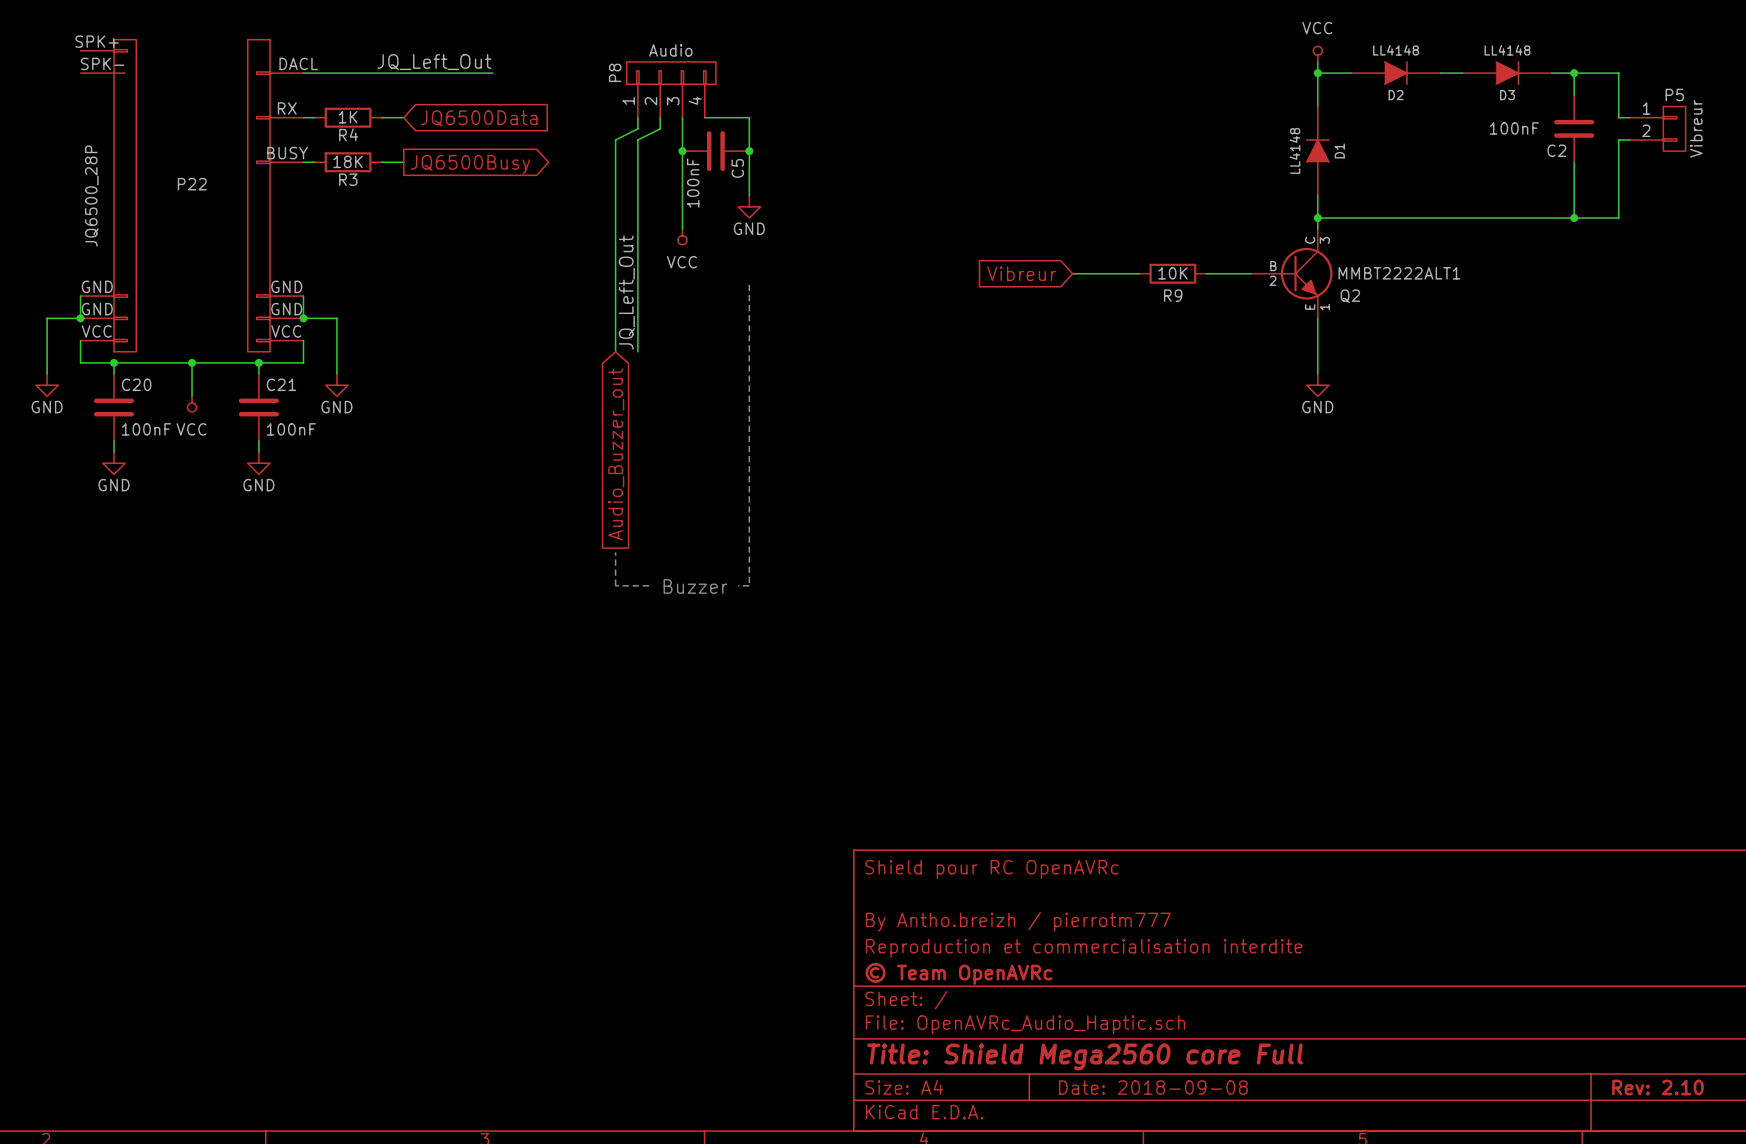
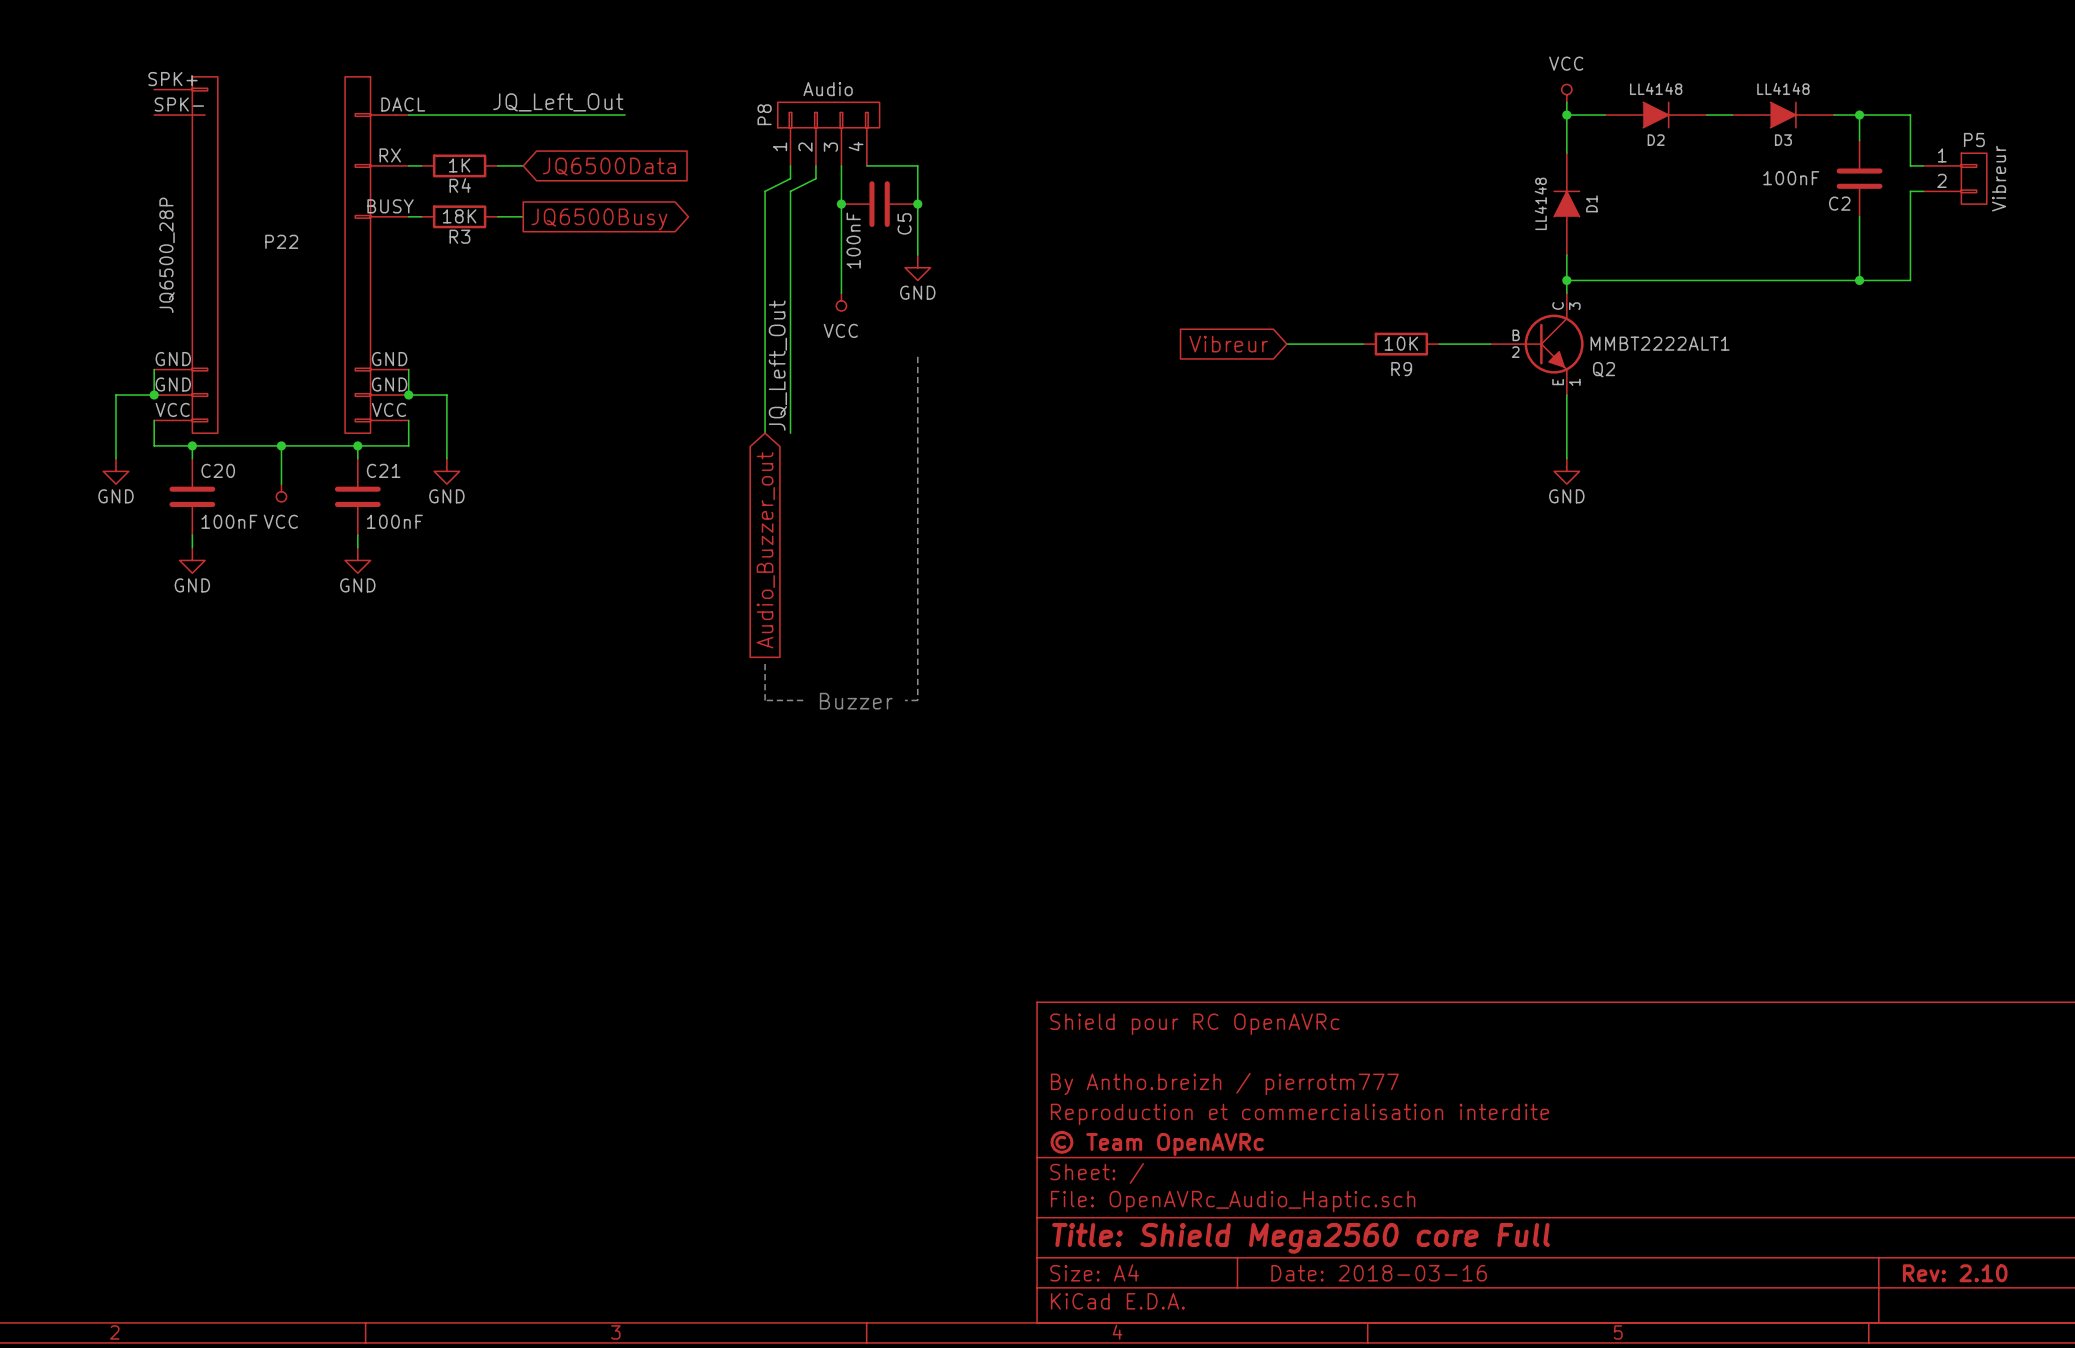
title block: Date: 2018-09-08 (1153, 1087) -> Date: 2018-03-16 (1379, 1273)

